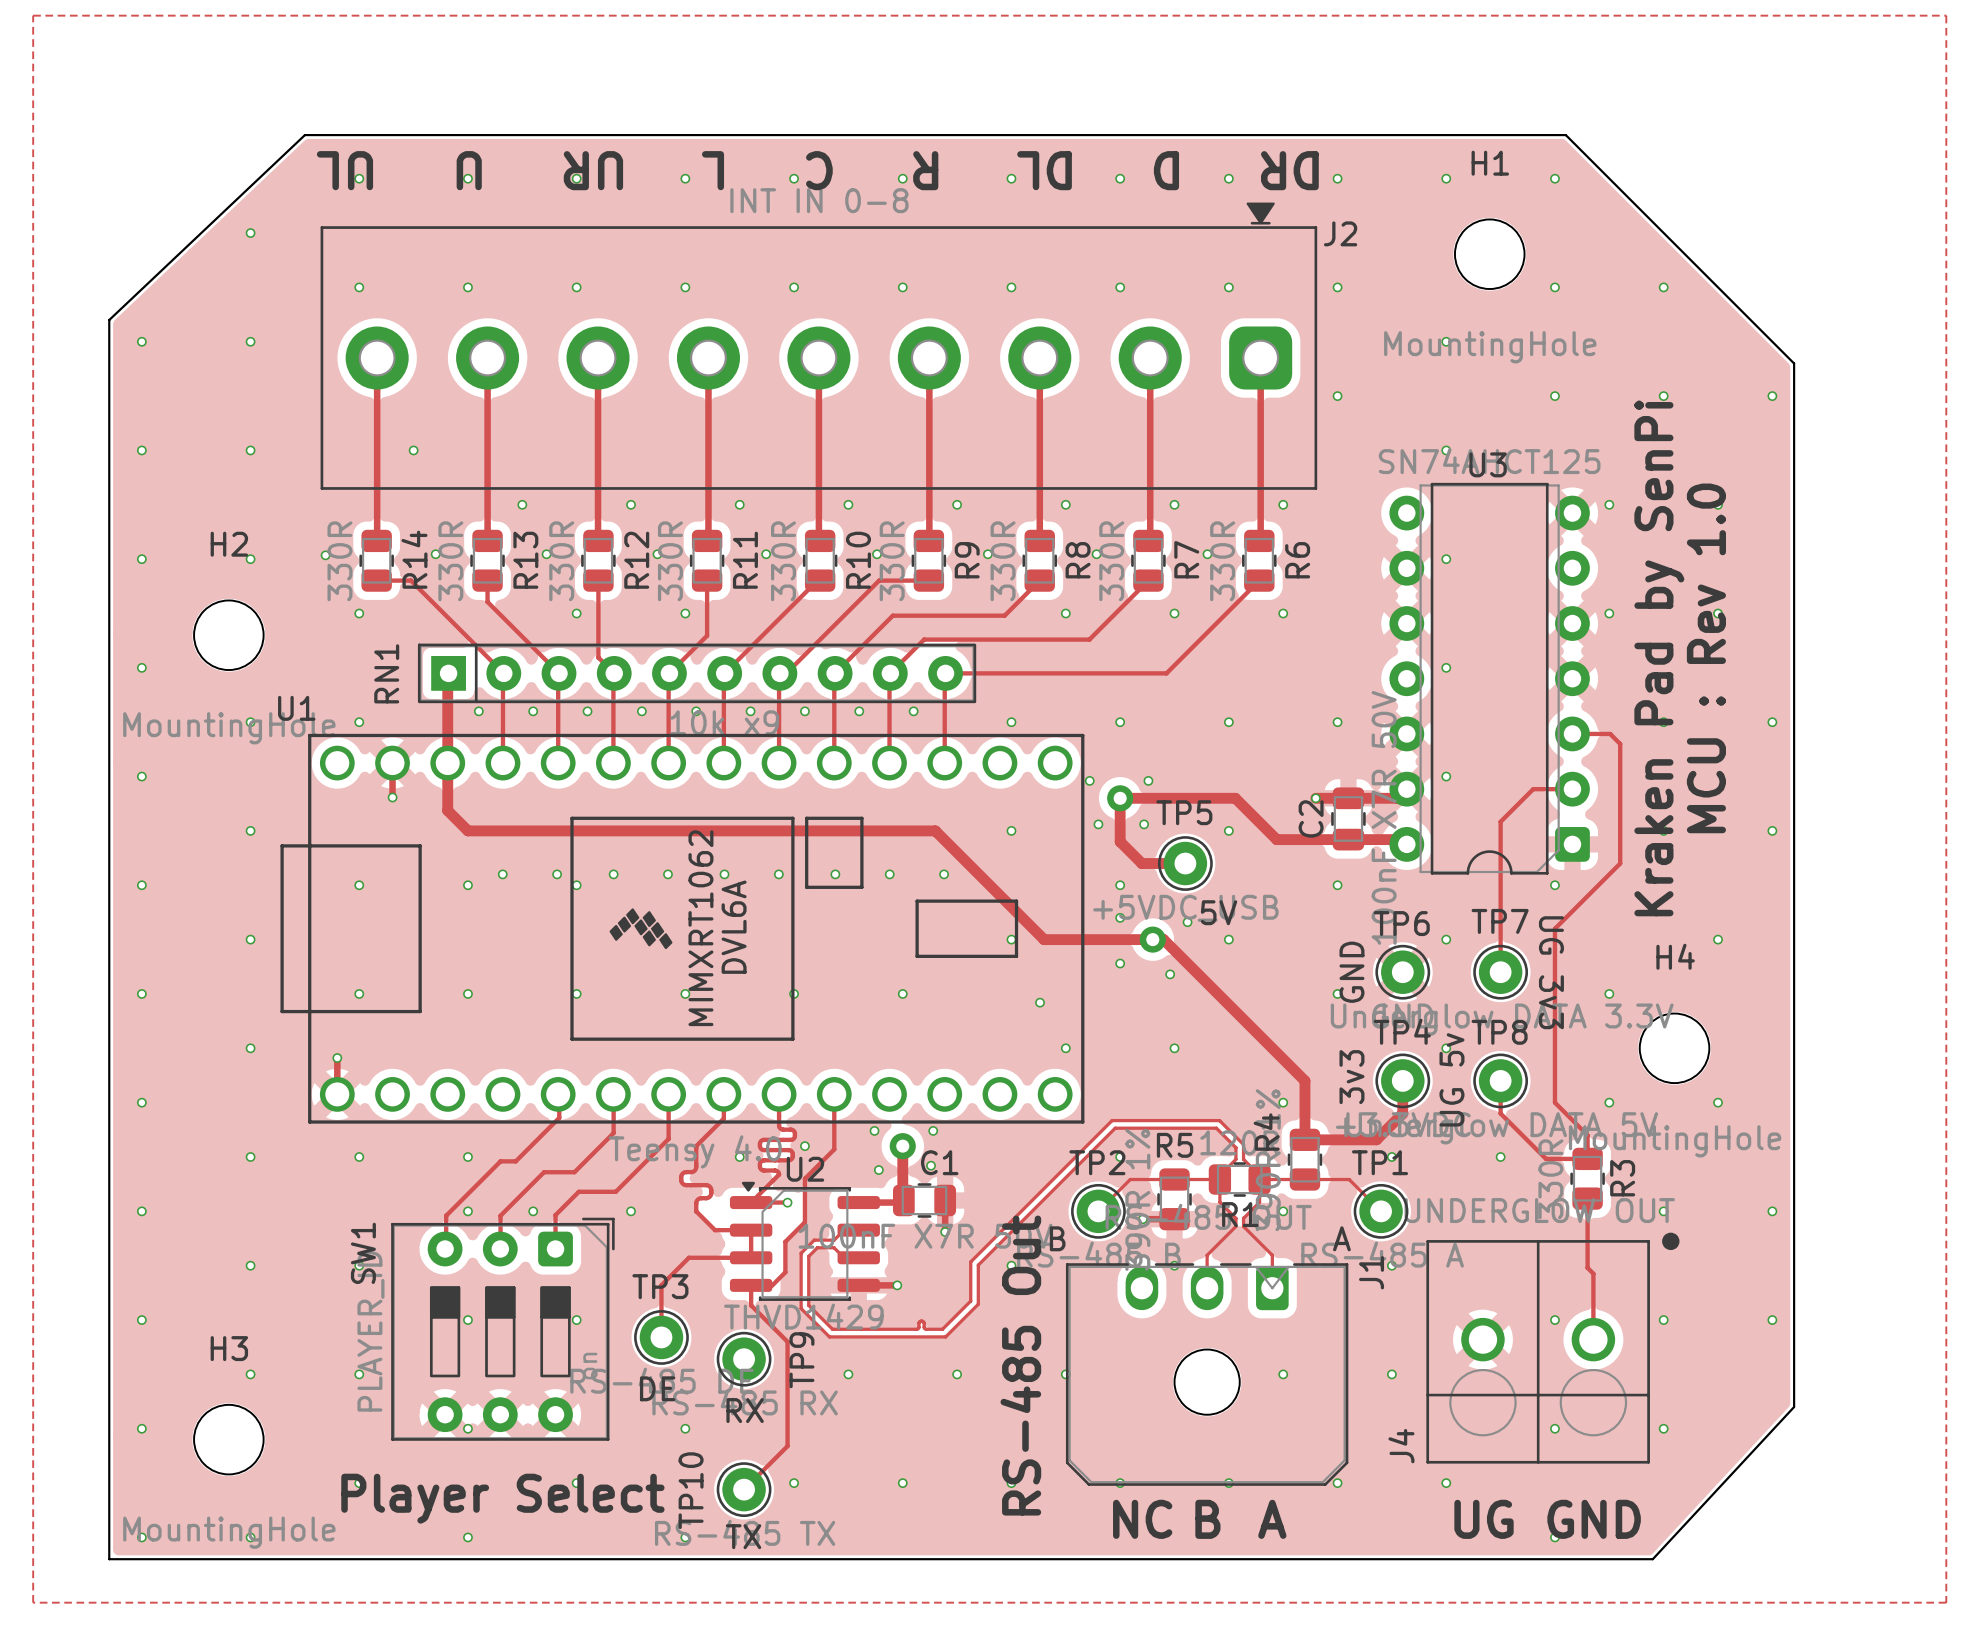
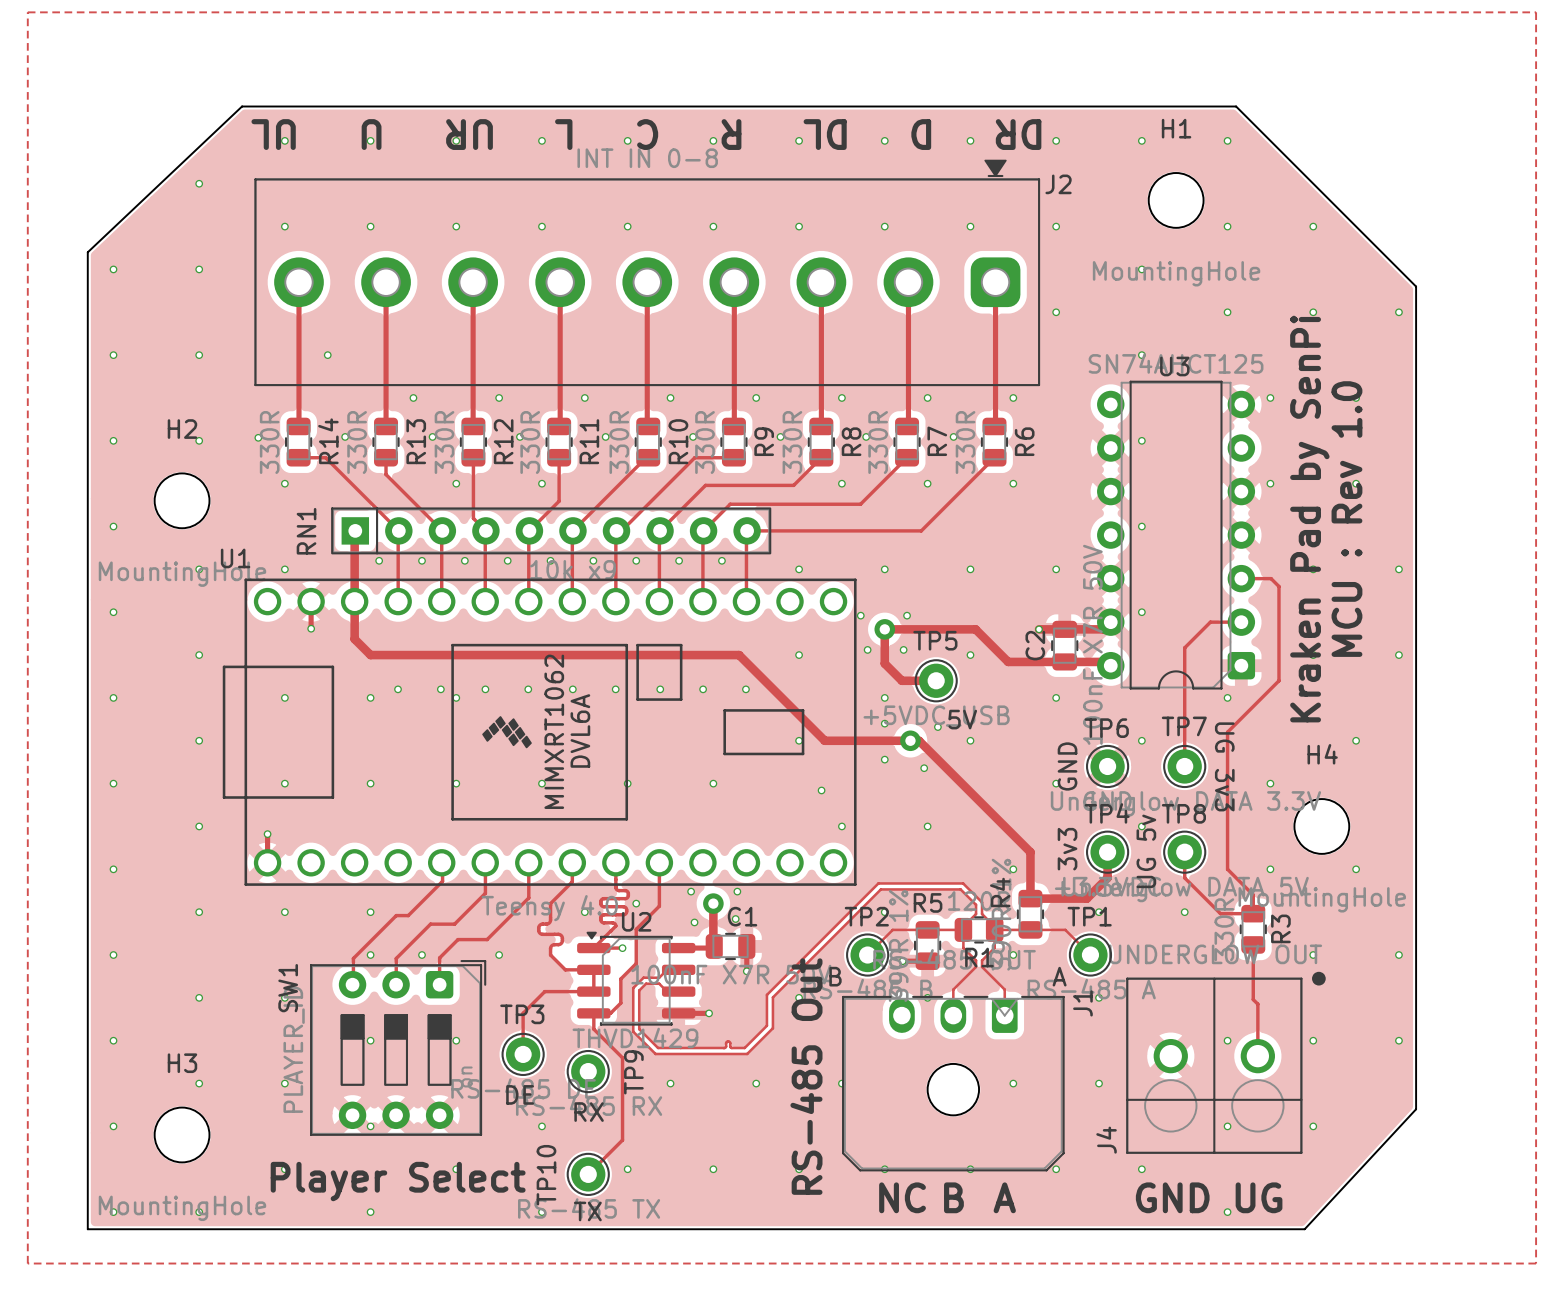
text: UG (1484, 1519) -> GND (1172, 1197)
text: GND (1594, 1519) -> UG (1259, 1197)

